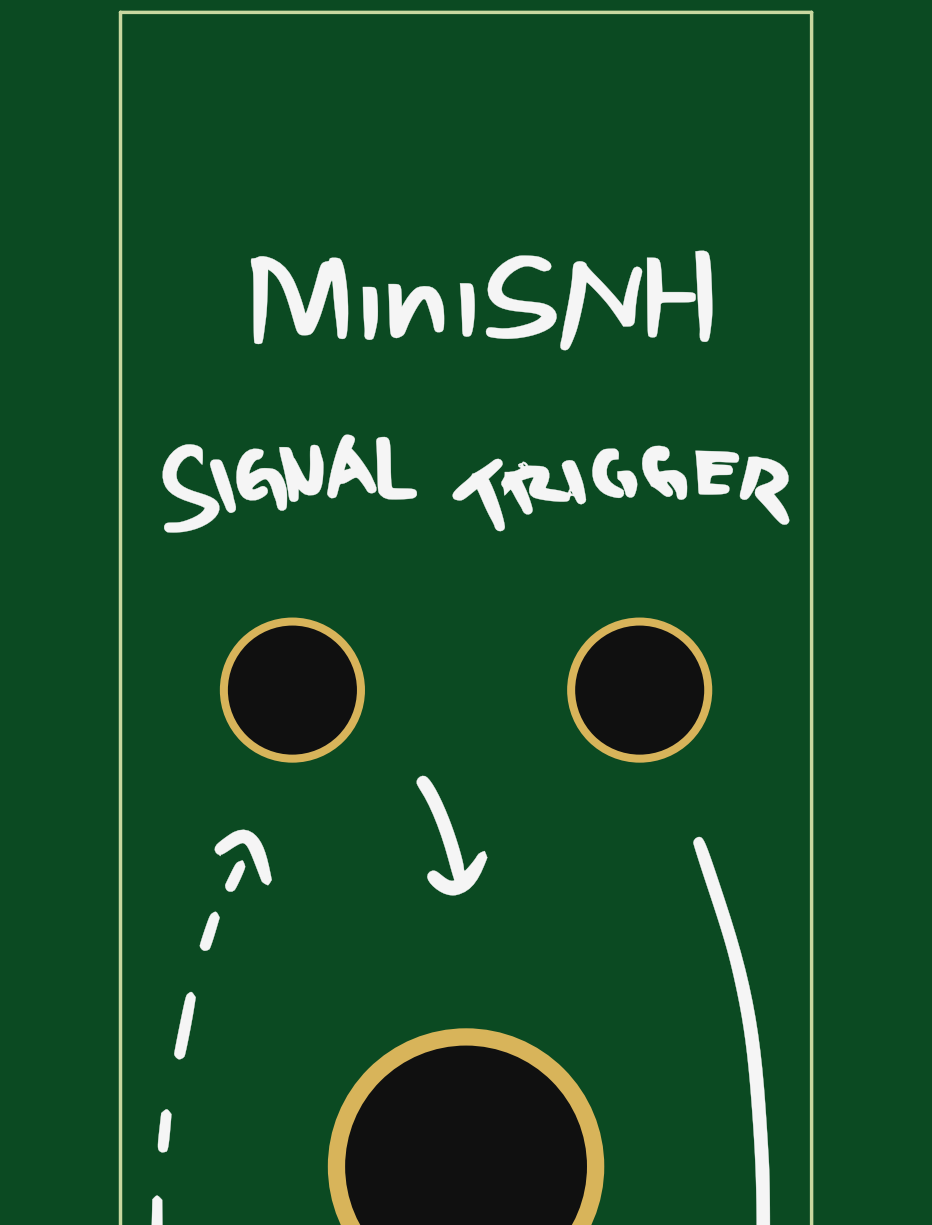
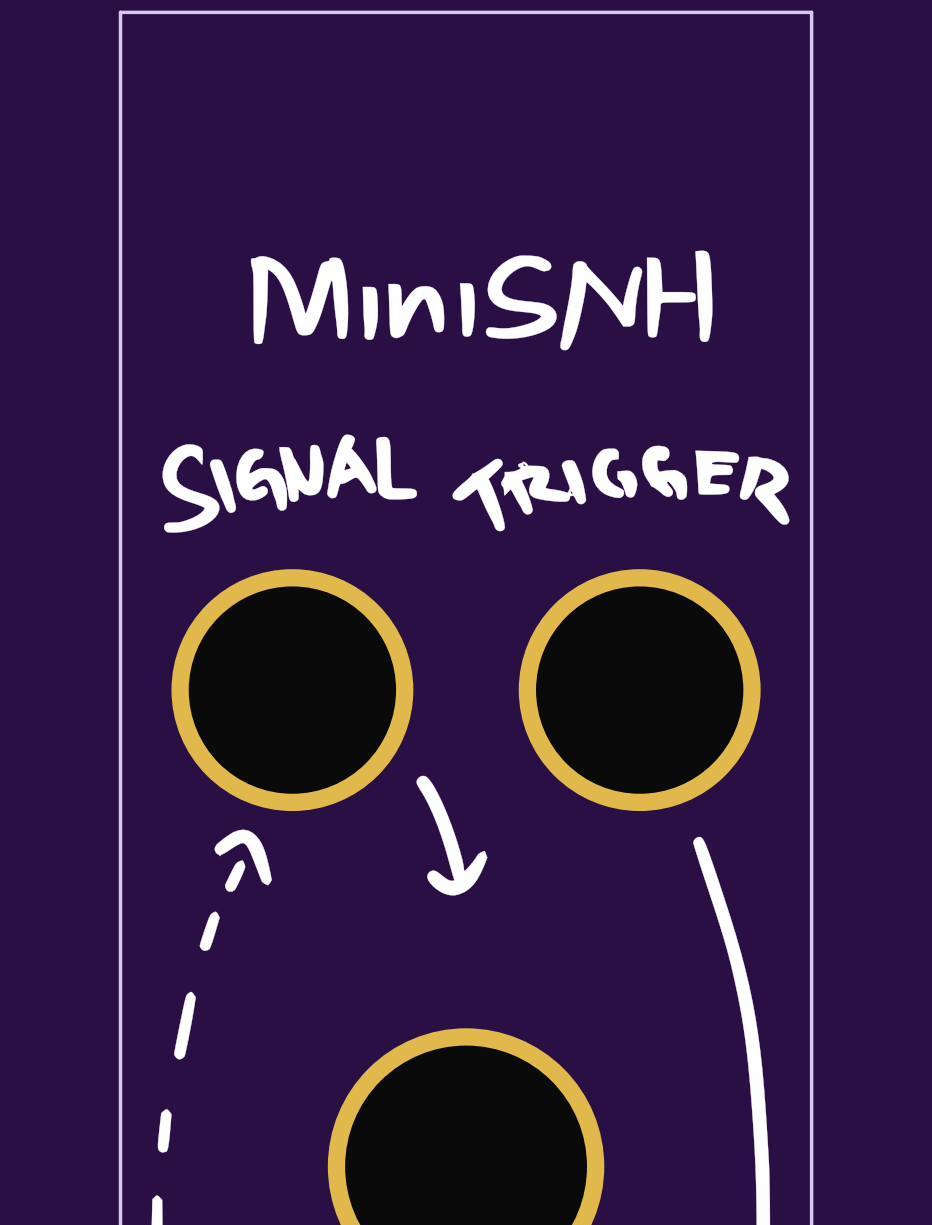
part footprint: [219, 617, 365, 763] -> [171, 569, 414, 812]
part footprint: [567, 617, 713, 763] -> [518, 569, 761, 812]

